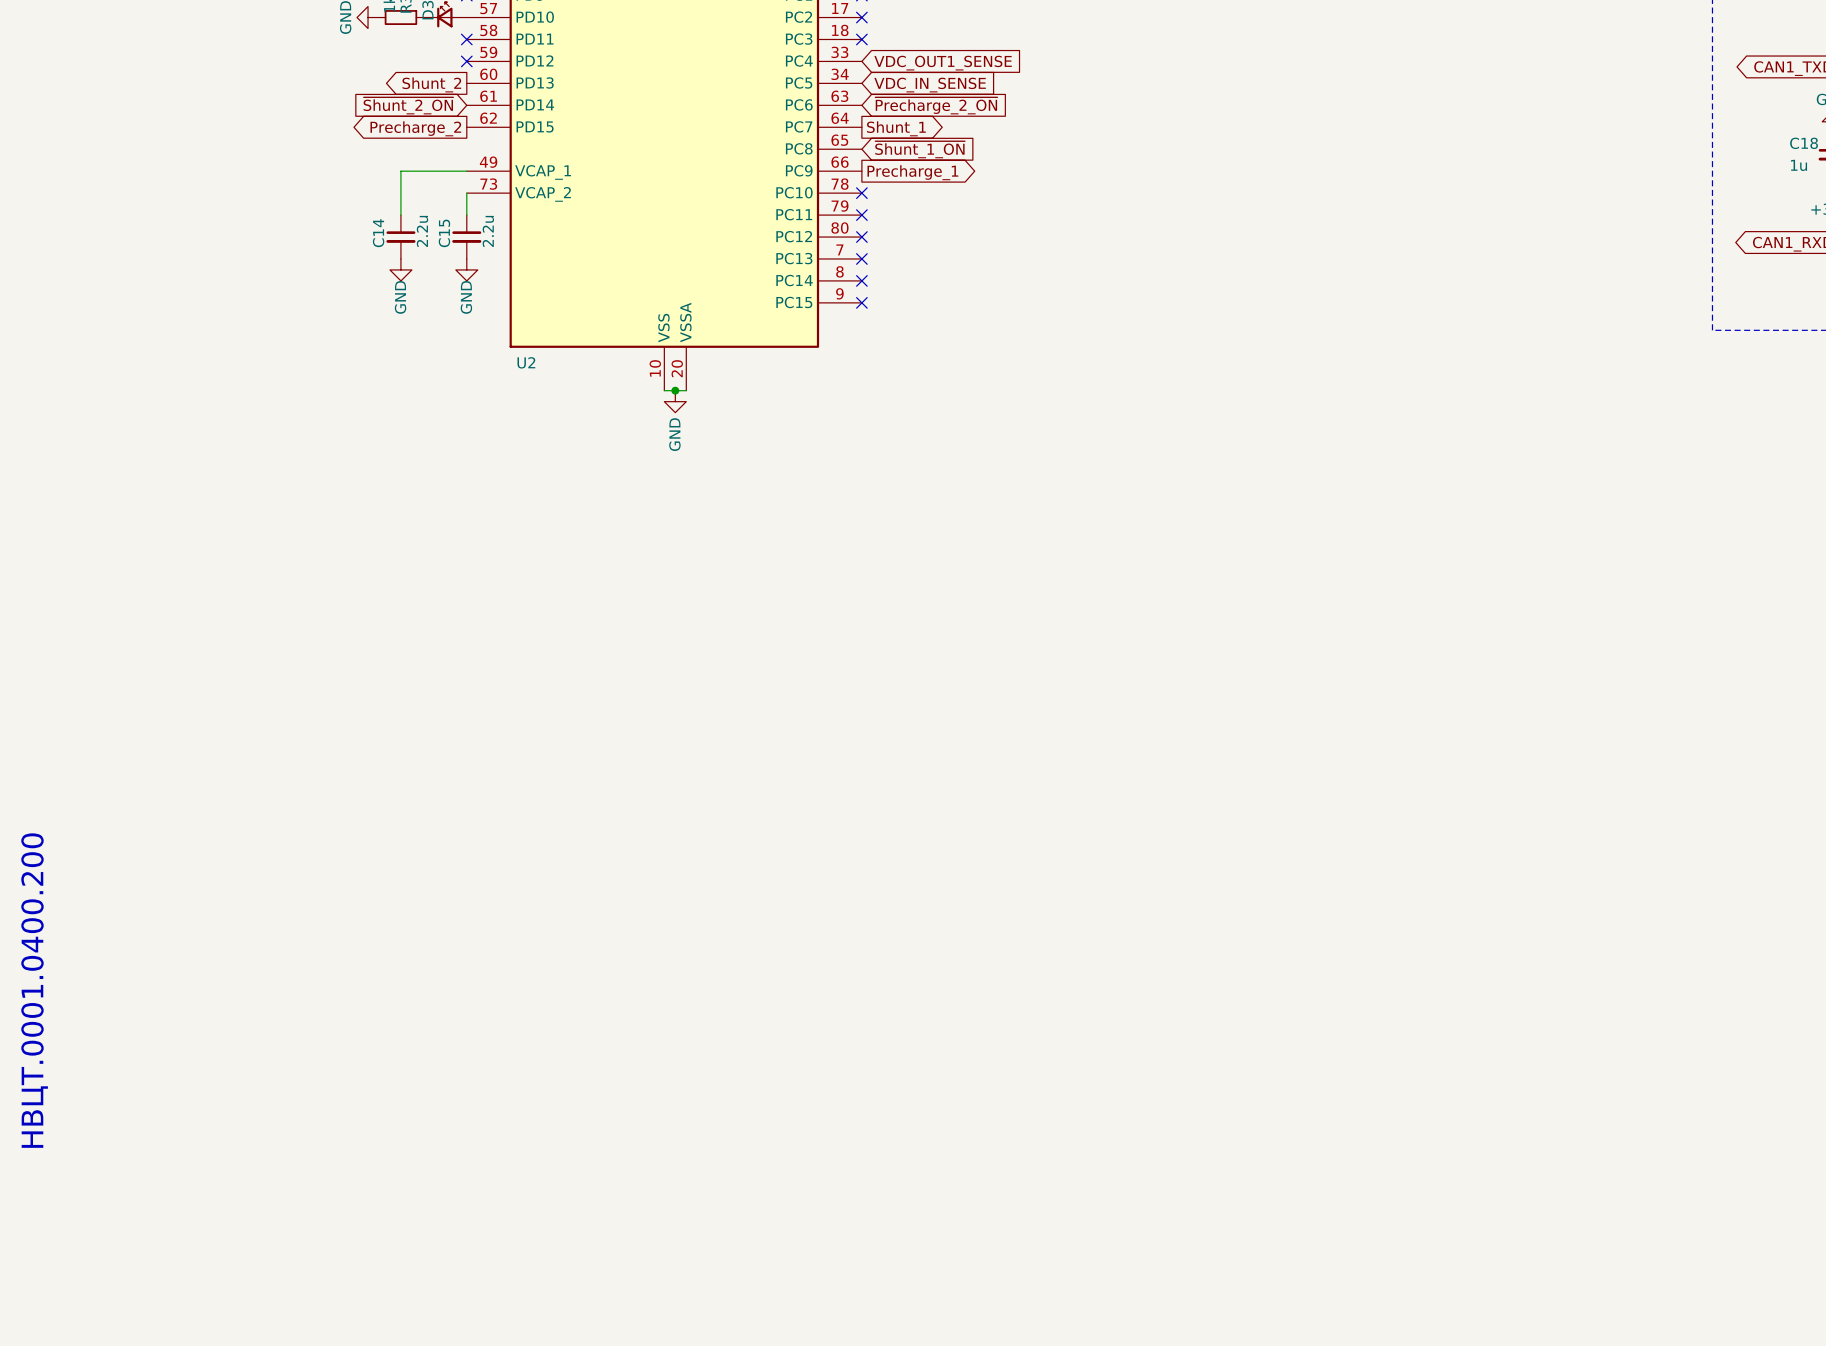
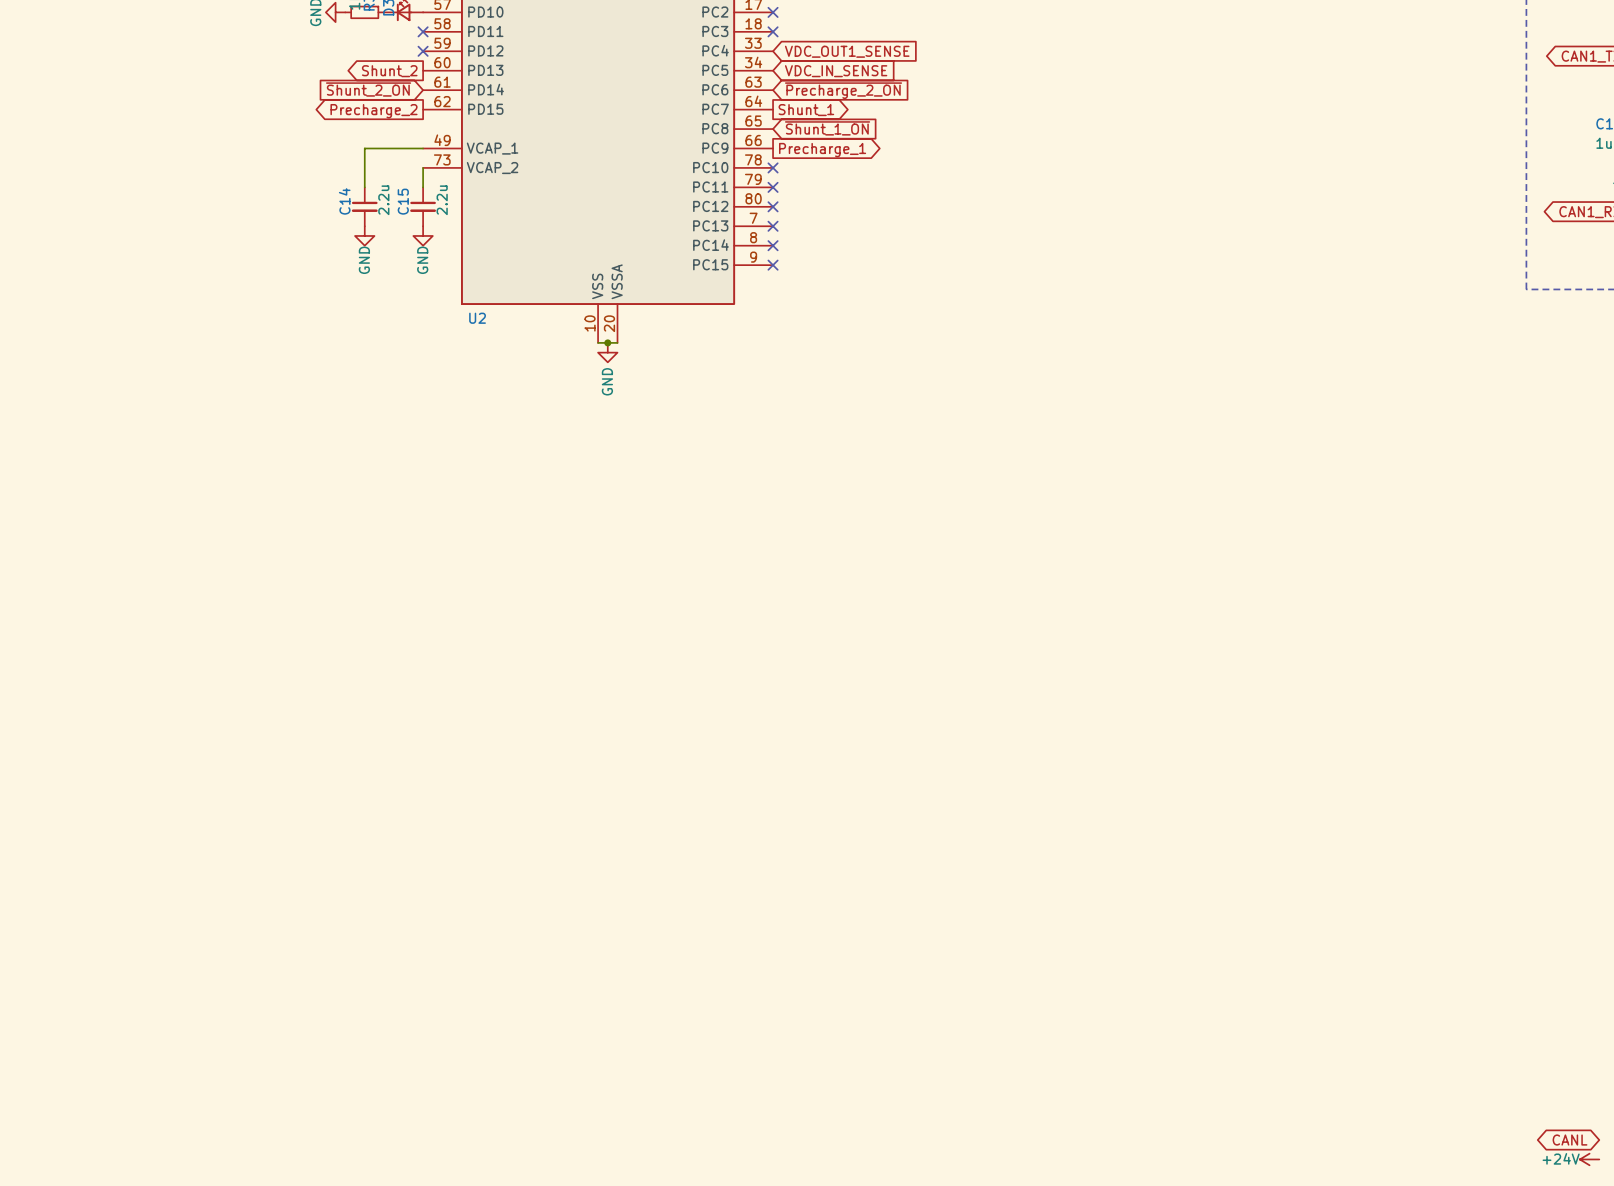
text: НВЦТ.0001.0400.200 (34, 990) -> none
global label: none -> CANL (1570, 1140)
power symbol: none -> +24V (1589, 1159)

